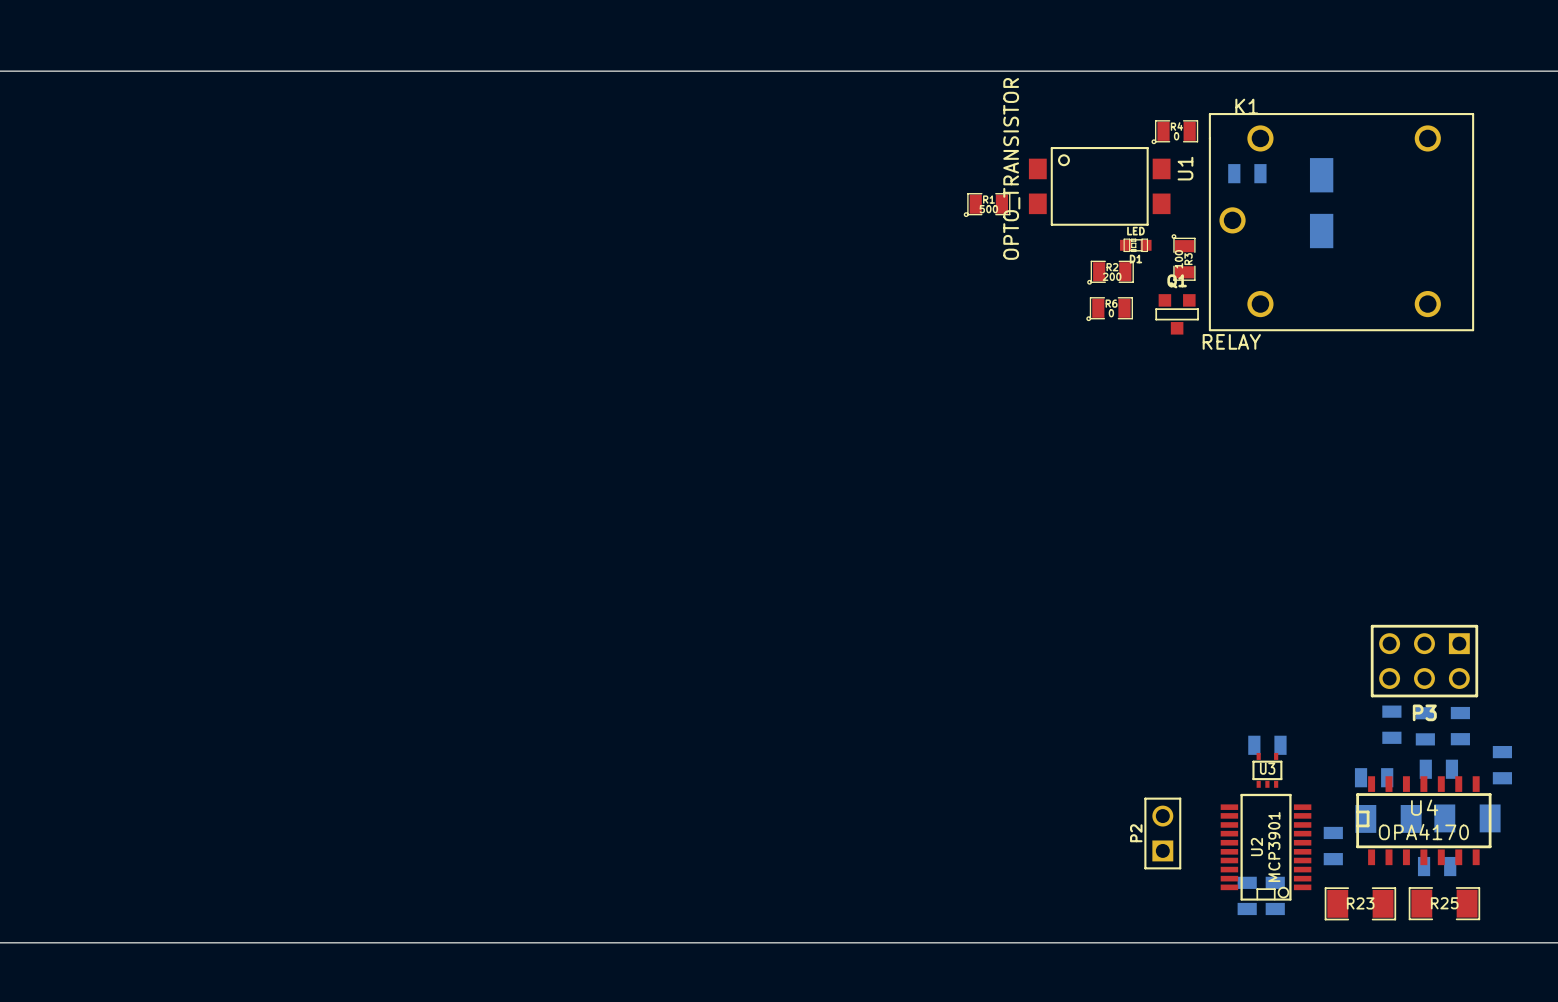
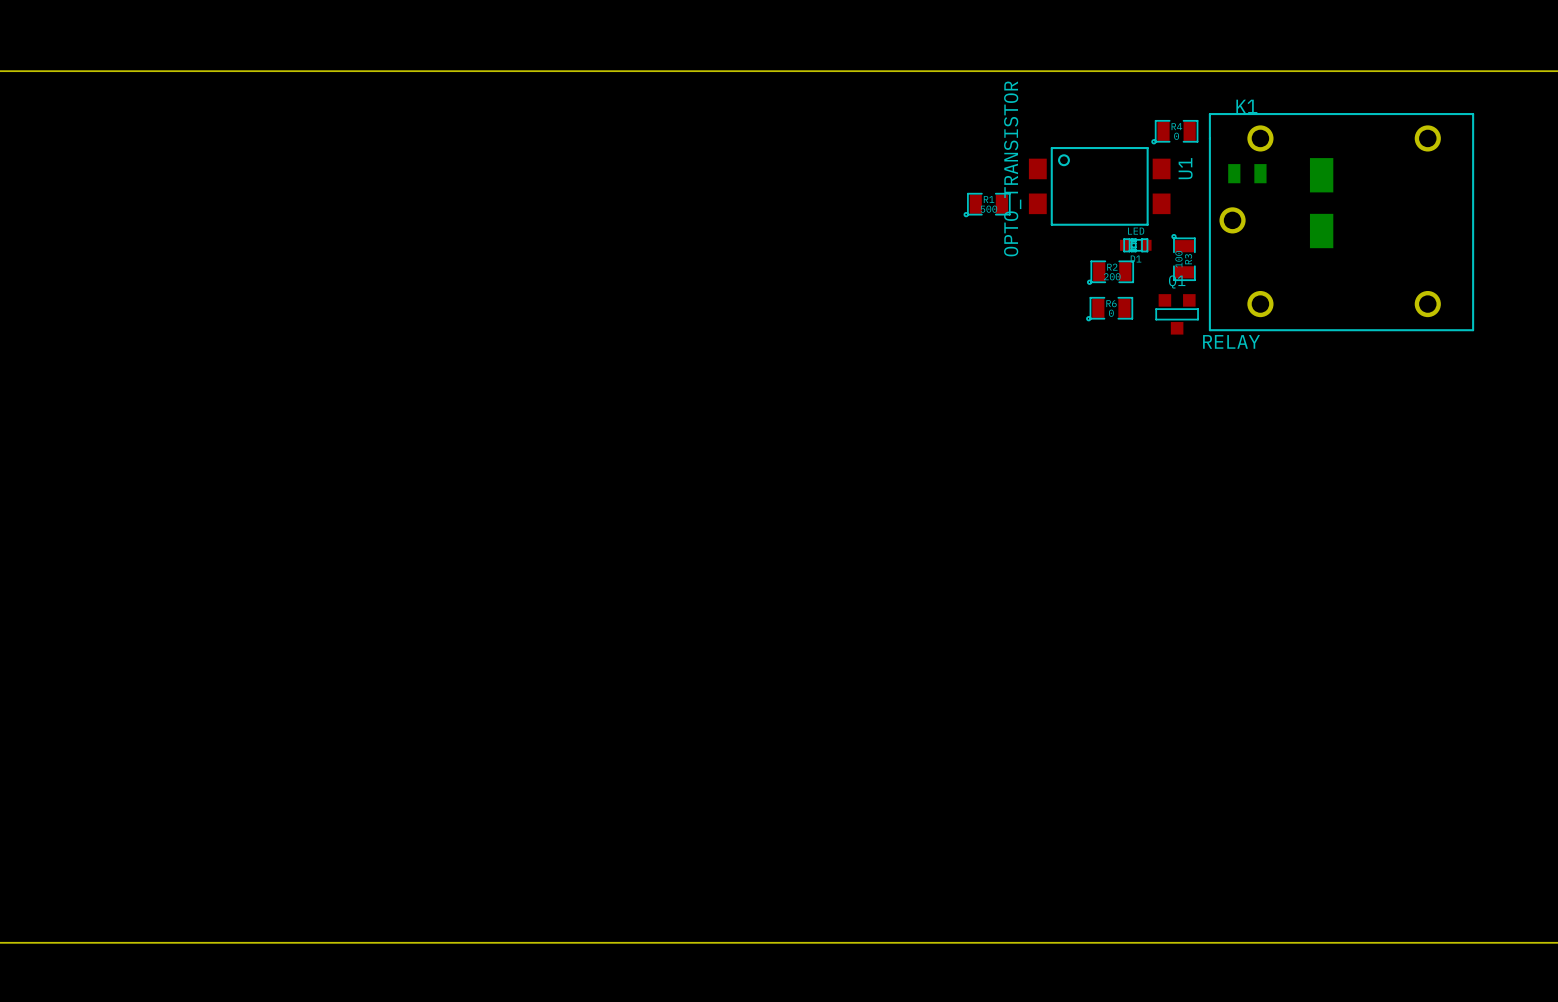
P3: (1424, 661) -> none
part: (1391, 724) -> none
part: (1425, 726) -> none
part: (1460, 726) -> none
part: (1267, 745) -> none
part: (1502, 765) -> none
part: (1438, 769) -> none
U3: (1267, 770) -> none
part: (1374, 777) -> none
part: (1388, 818) -> none
part: (1467, 818) -> none
U4: OPA4170 (1423, 820) -> none
P2: (1162, 833) -> none
part: (1333, 846) -> none
U2: MCP3901 (1266, 847) -> none
part: (1437, 866) -> none
part: (1247, 895) -> none
part: (1275, 895) -> none
R23: (1360, 903) -> none
R25: (1444, 903) -> none

